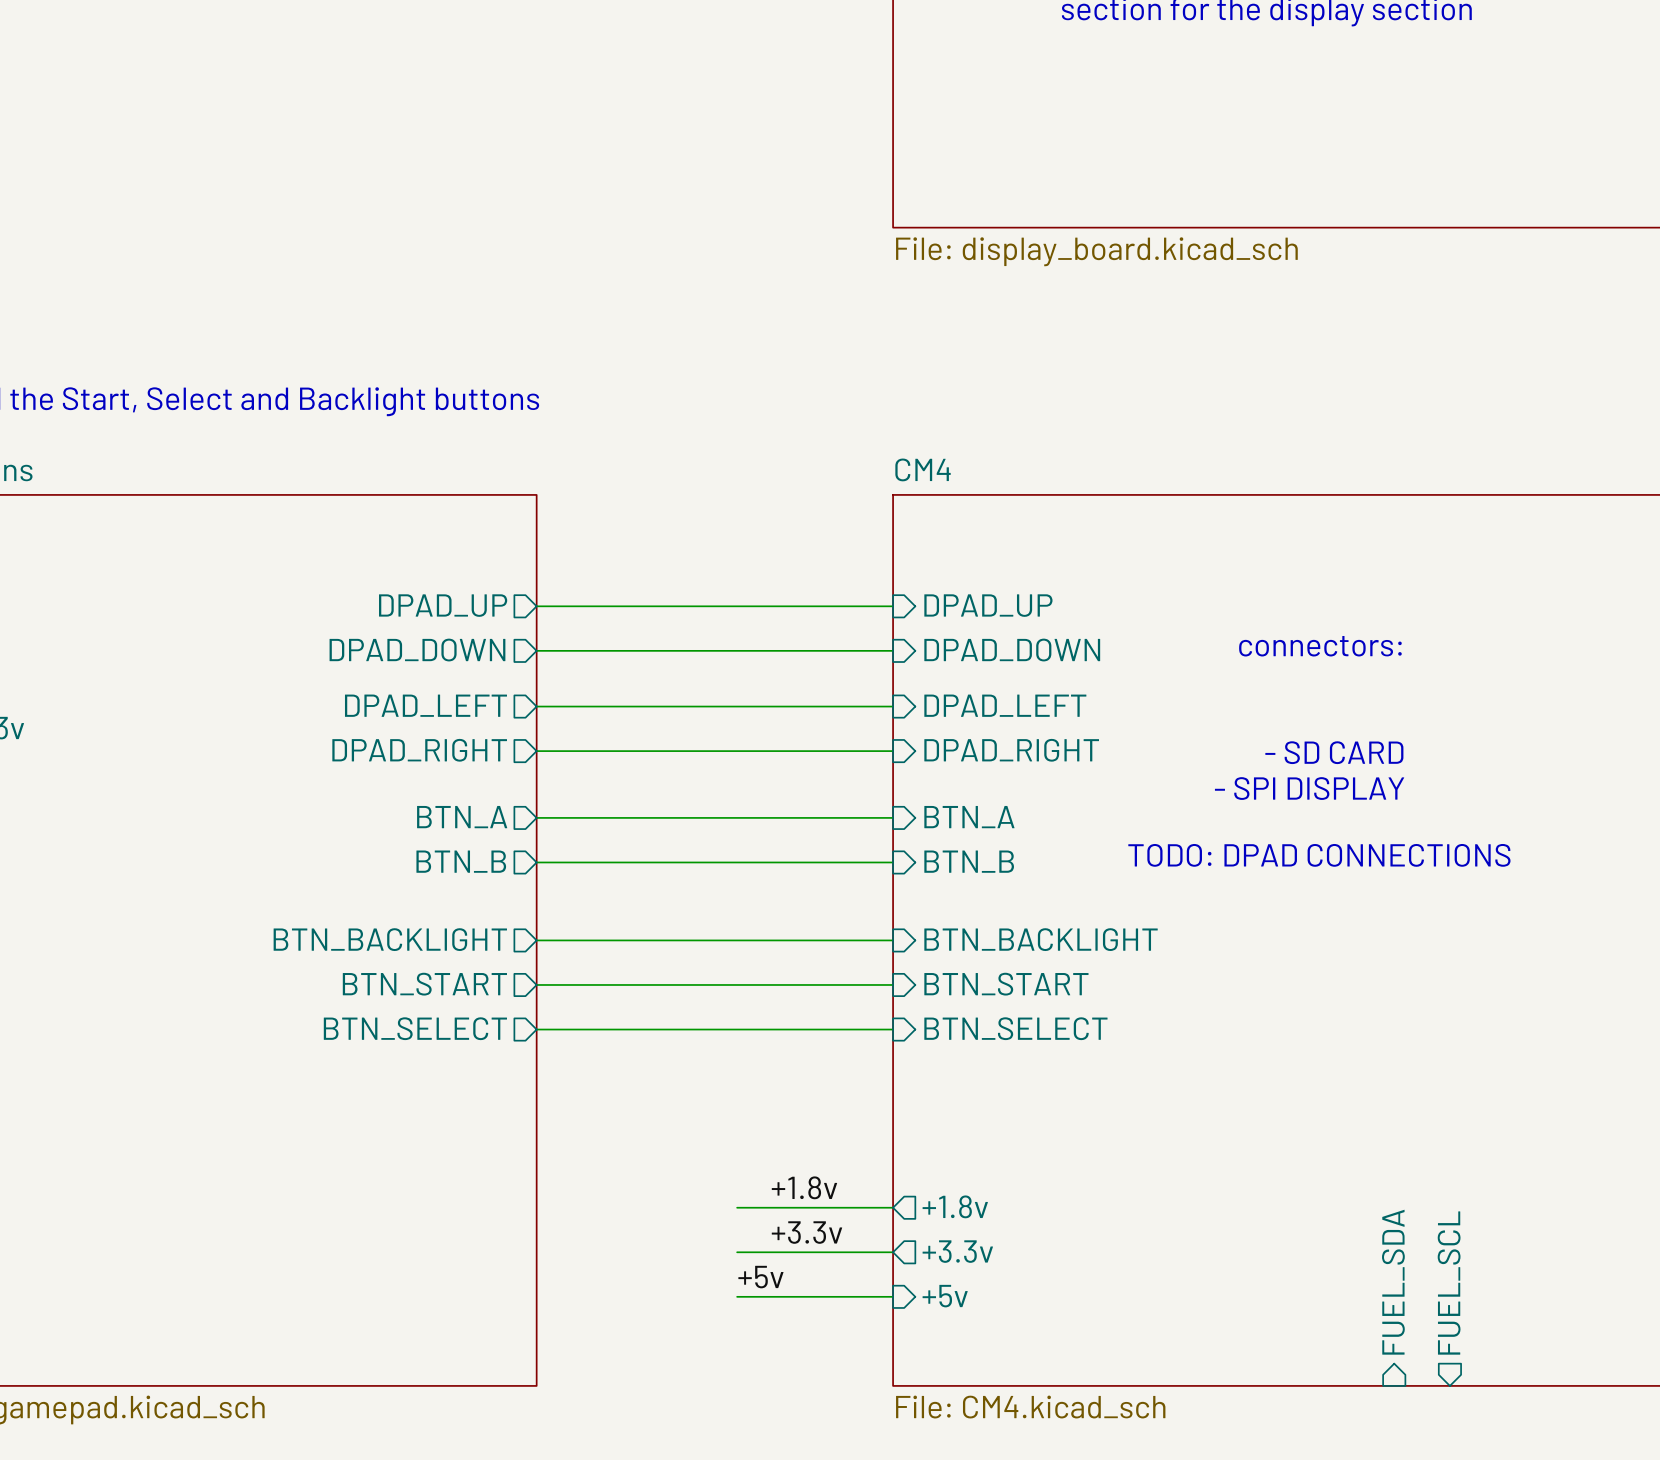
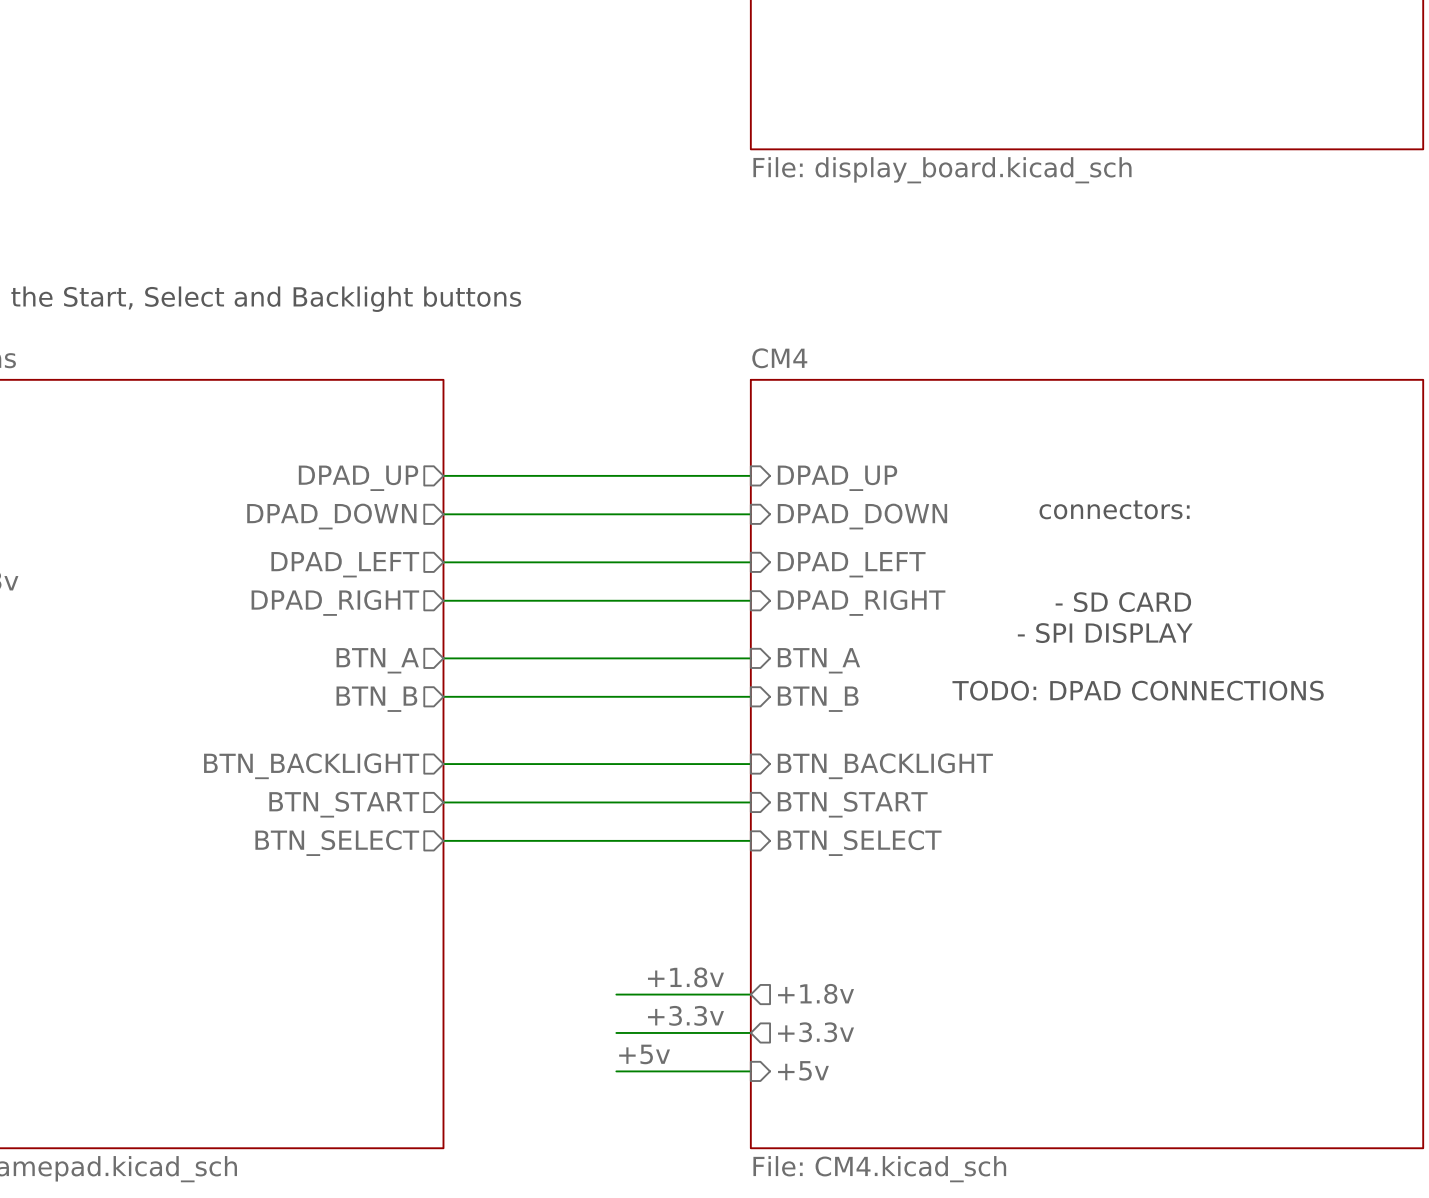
sheet pin: FUEL_SDA (1393, 1282) -> none
sheet pin: FUEL_SCL (1449, 1283) -> none

